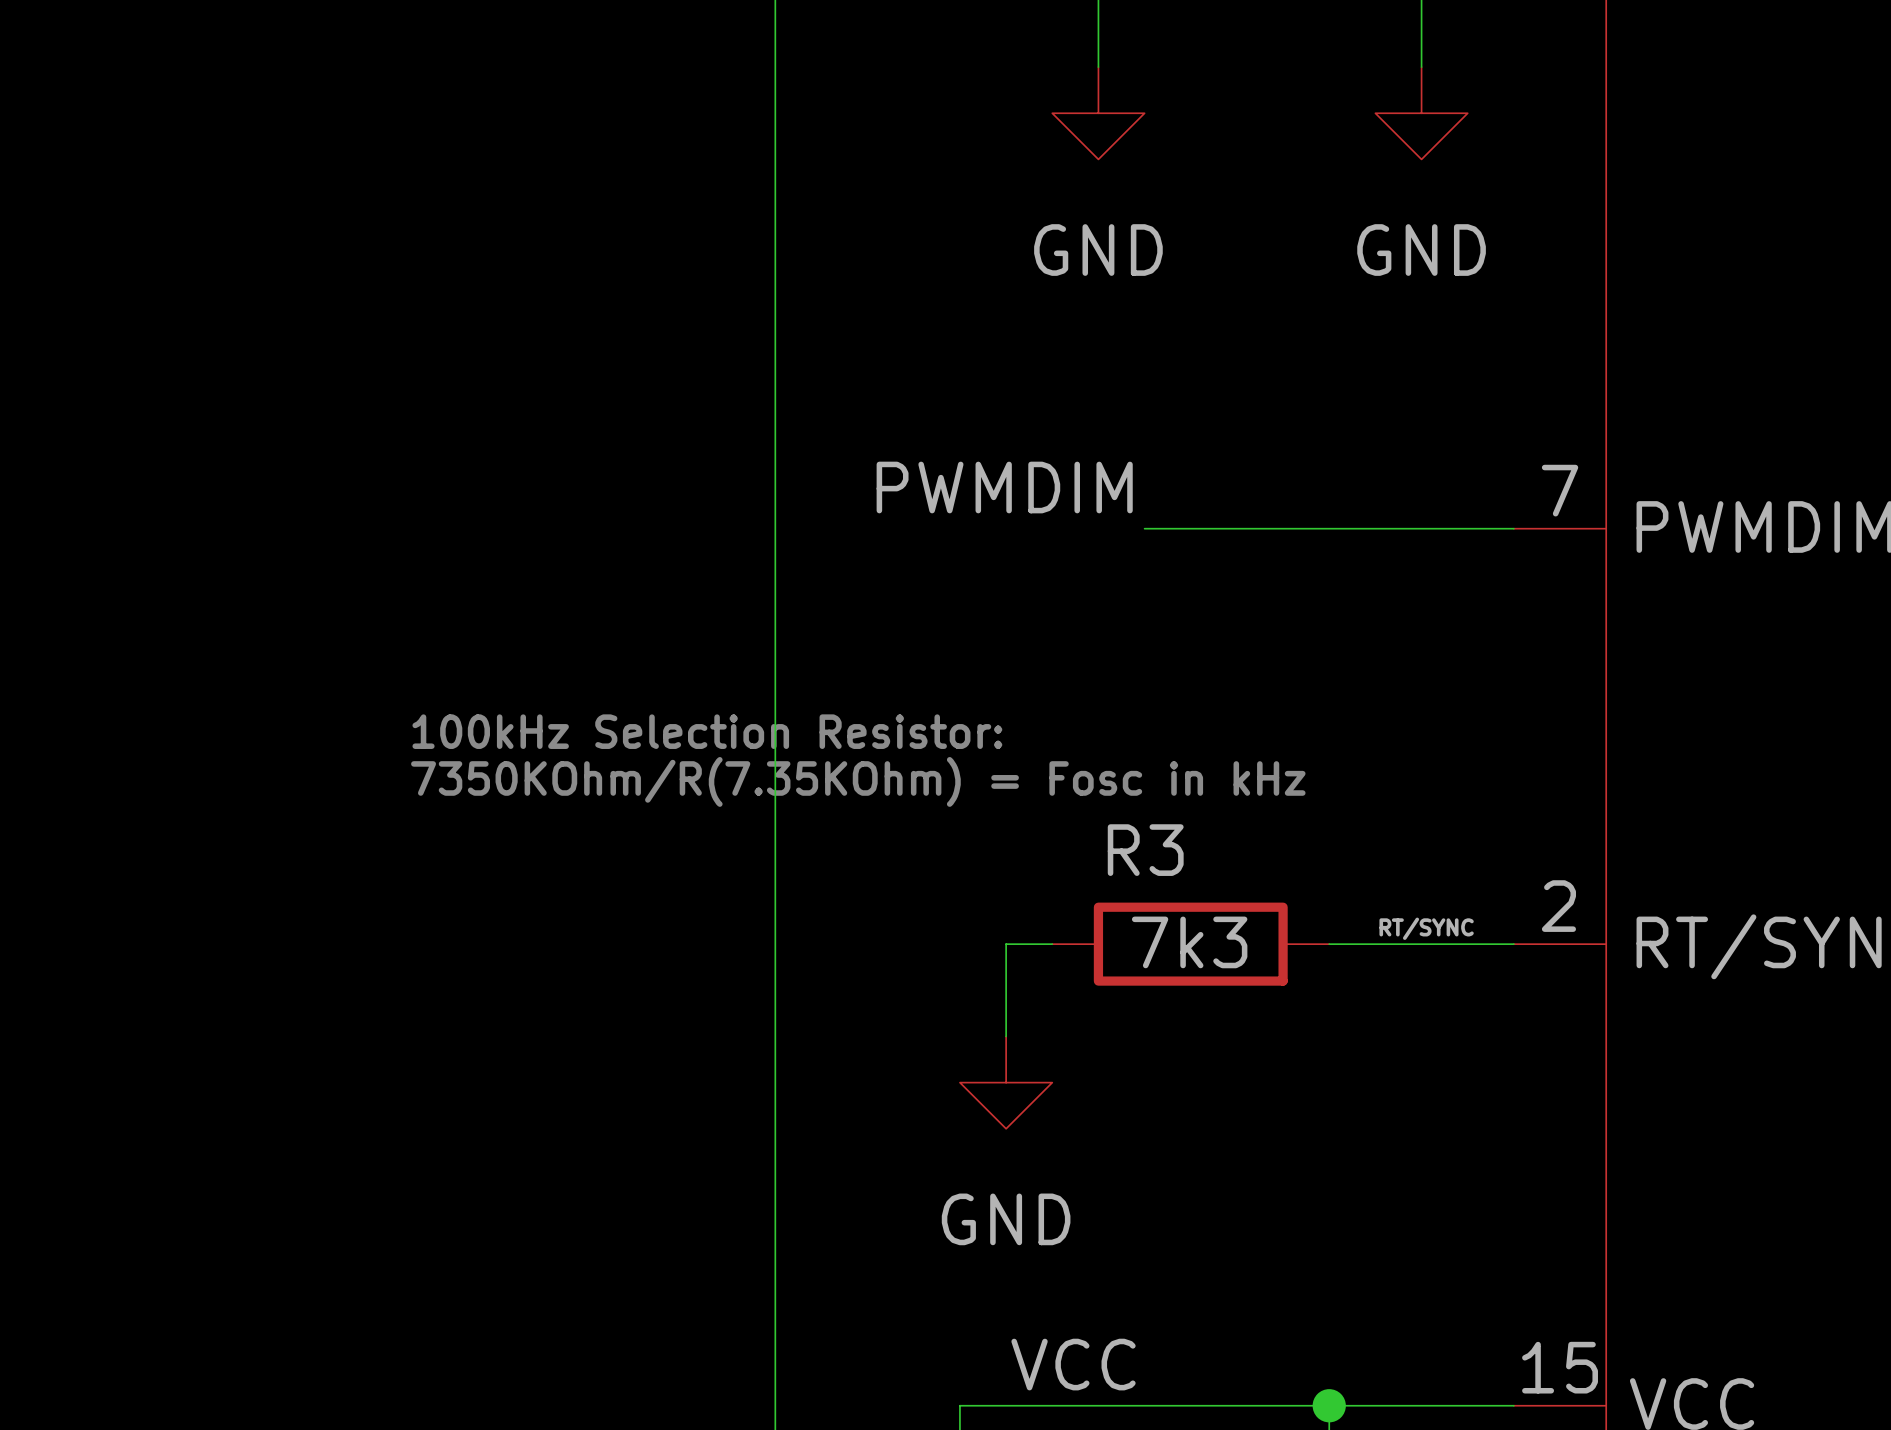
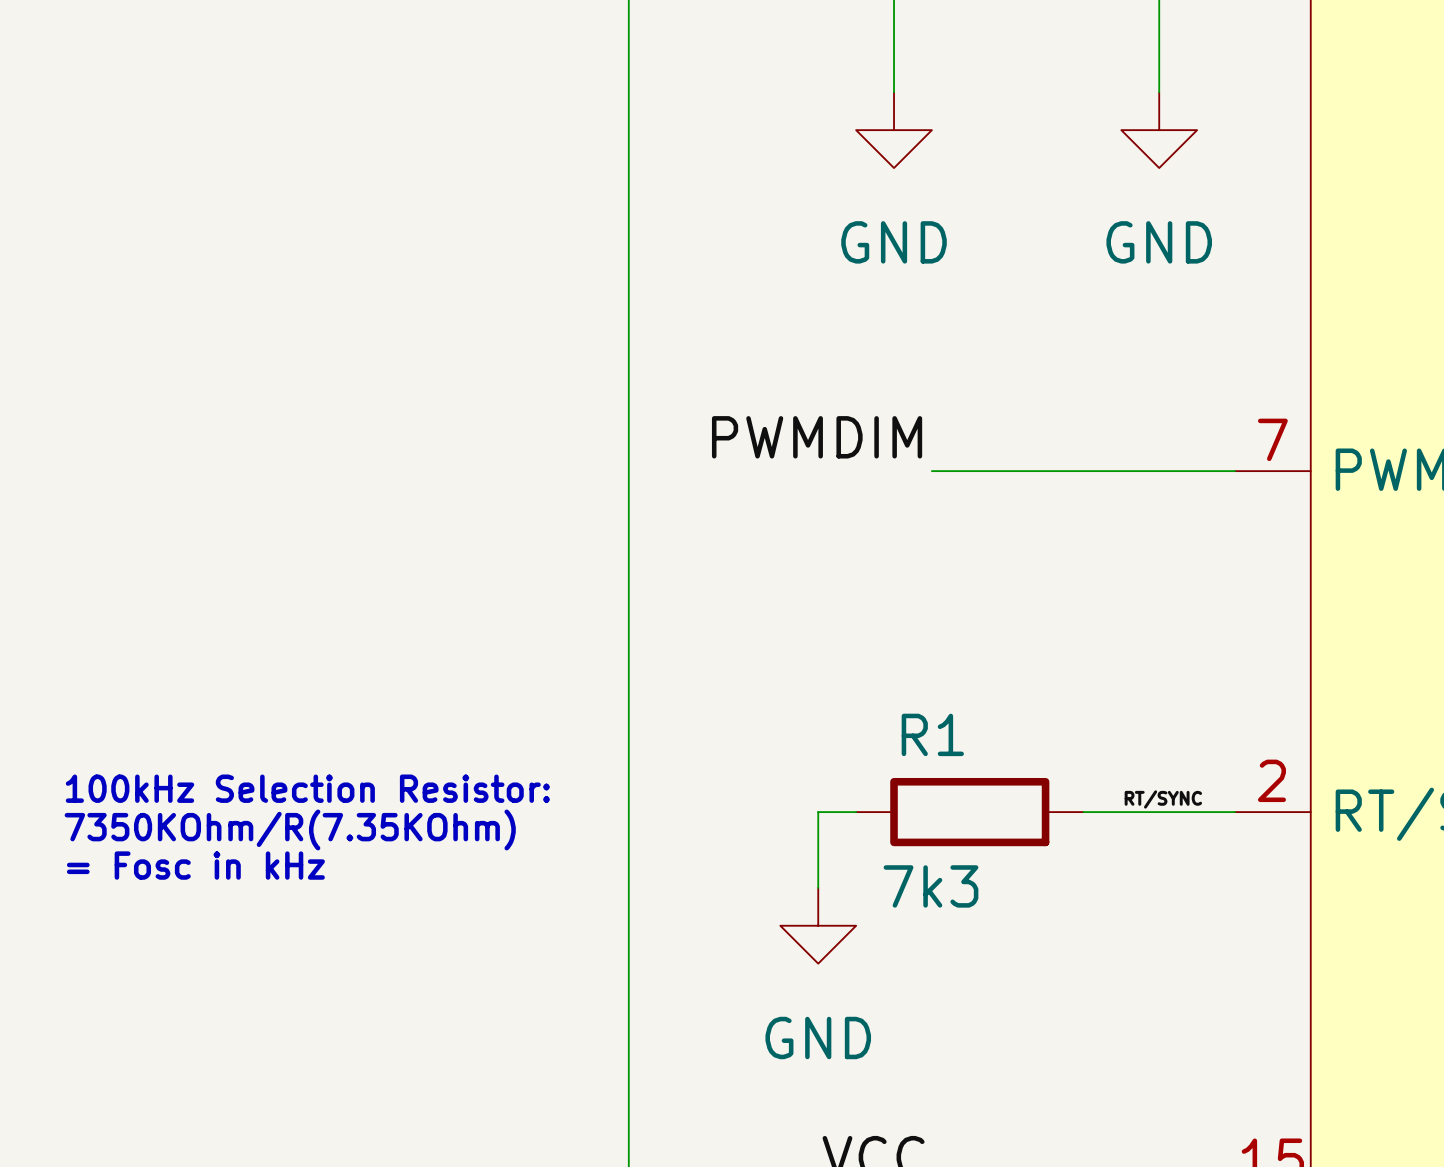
text position: 100kHz Selection Resistor: (707, 731) -> 100kHz Selection Resistor: (307, 788)
text: 7350KOhm/R(7.35KOhm) = Fosc in kHz (858, 781) -> none
R3 name: R3 (1145, 850) -> R1 (932, 734)
R3 value position: 7k3 (1189, 942) -> 7k3 (931, 886)
text: none -> 7350KOhm/R(7.35KOhm) (290, 829)
text: none -> = Fosc in kHz (195, 865)

